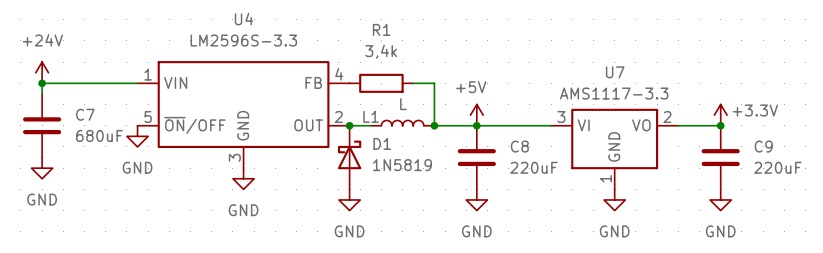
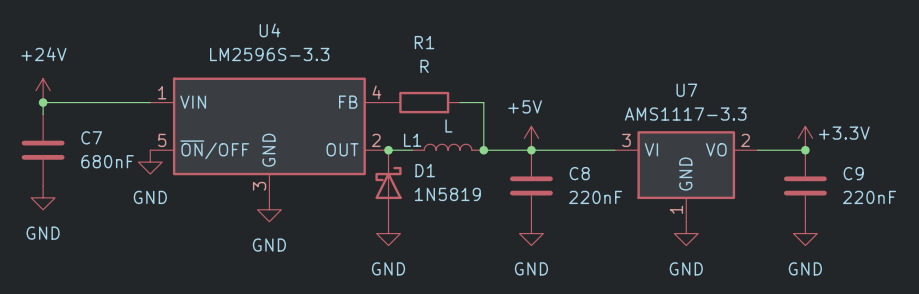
R1 value: 3,4k (381, 51) -> R (424, 66)
C7 value: 680uF (99, 135) -> 680nF (107, 161)
C8 value: 220uF (533, 167) -> 220nF (595, 197)
C9 value: 220uF (777, 167) -> 220nF (869, 197)

